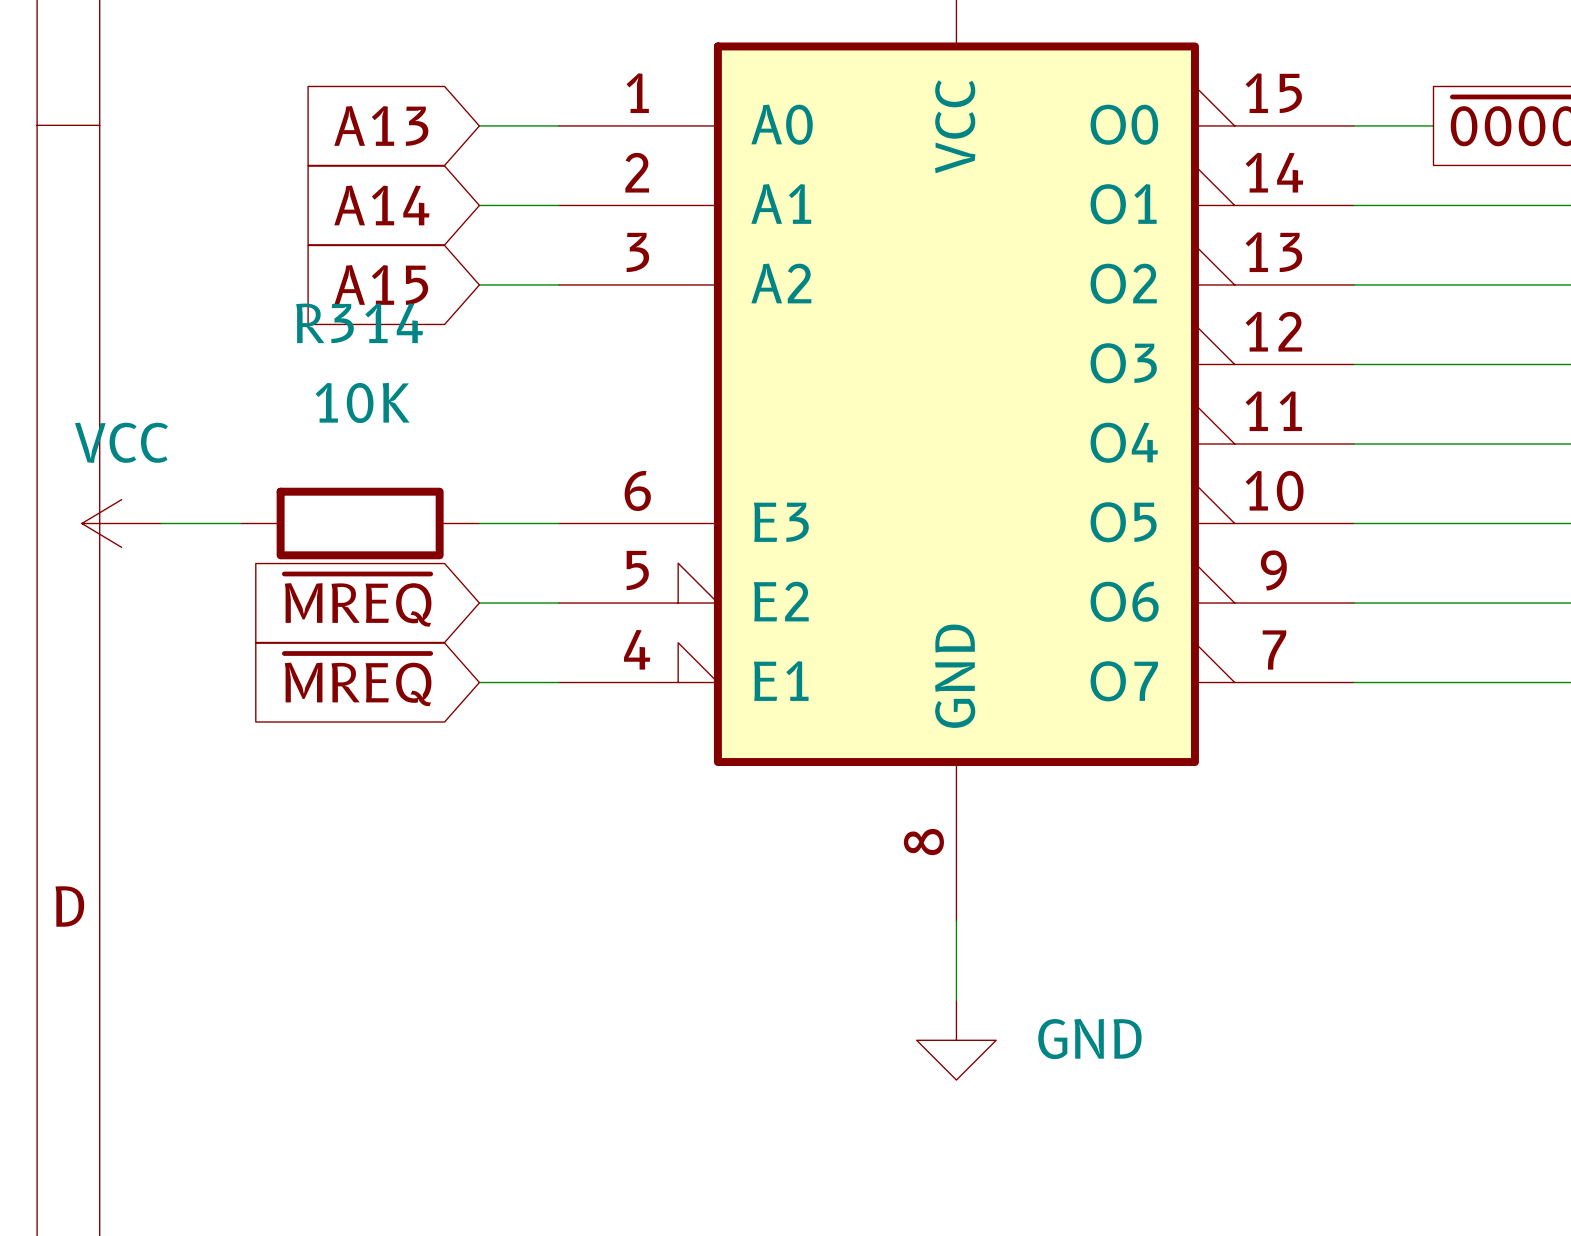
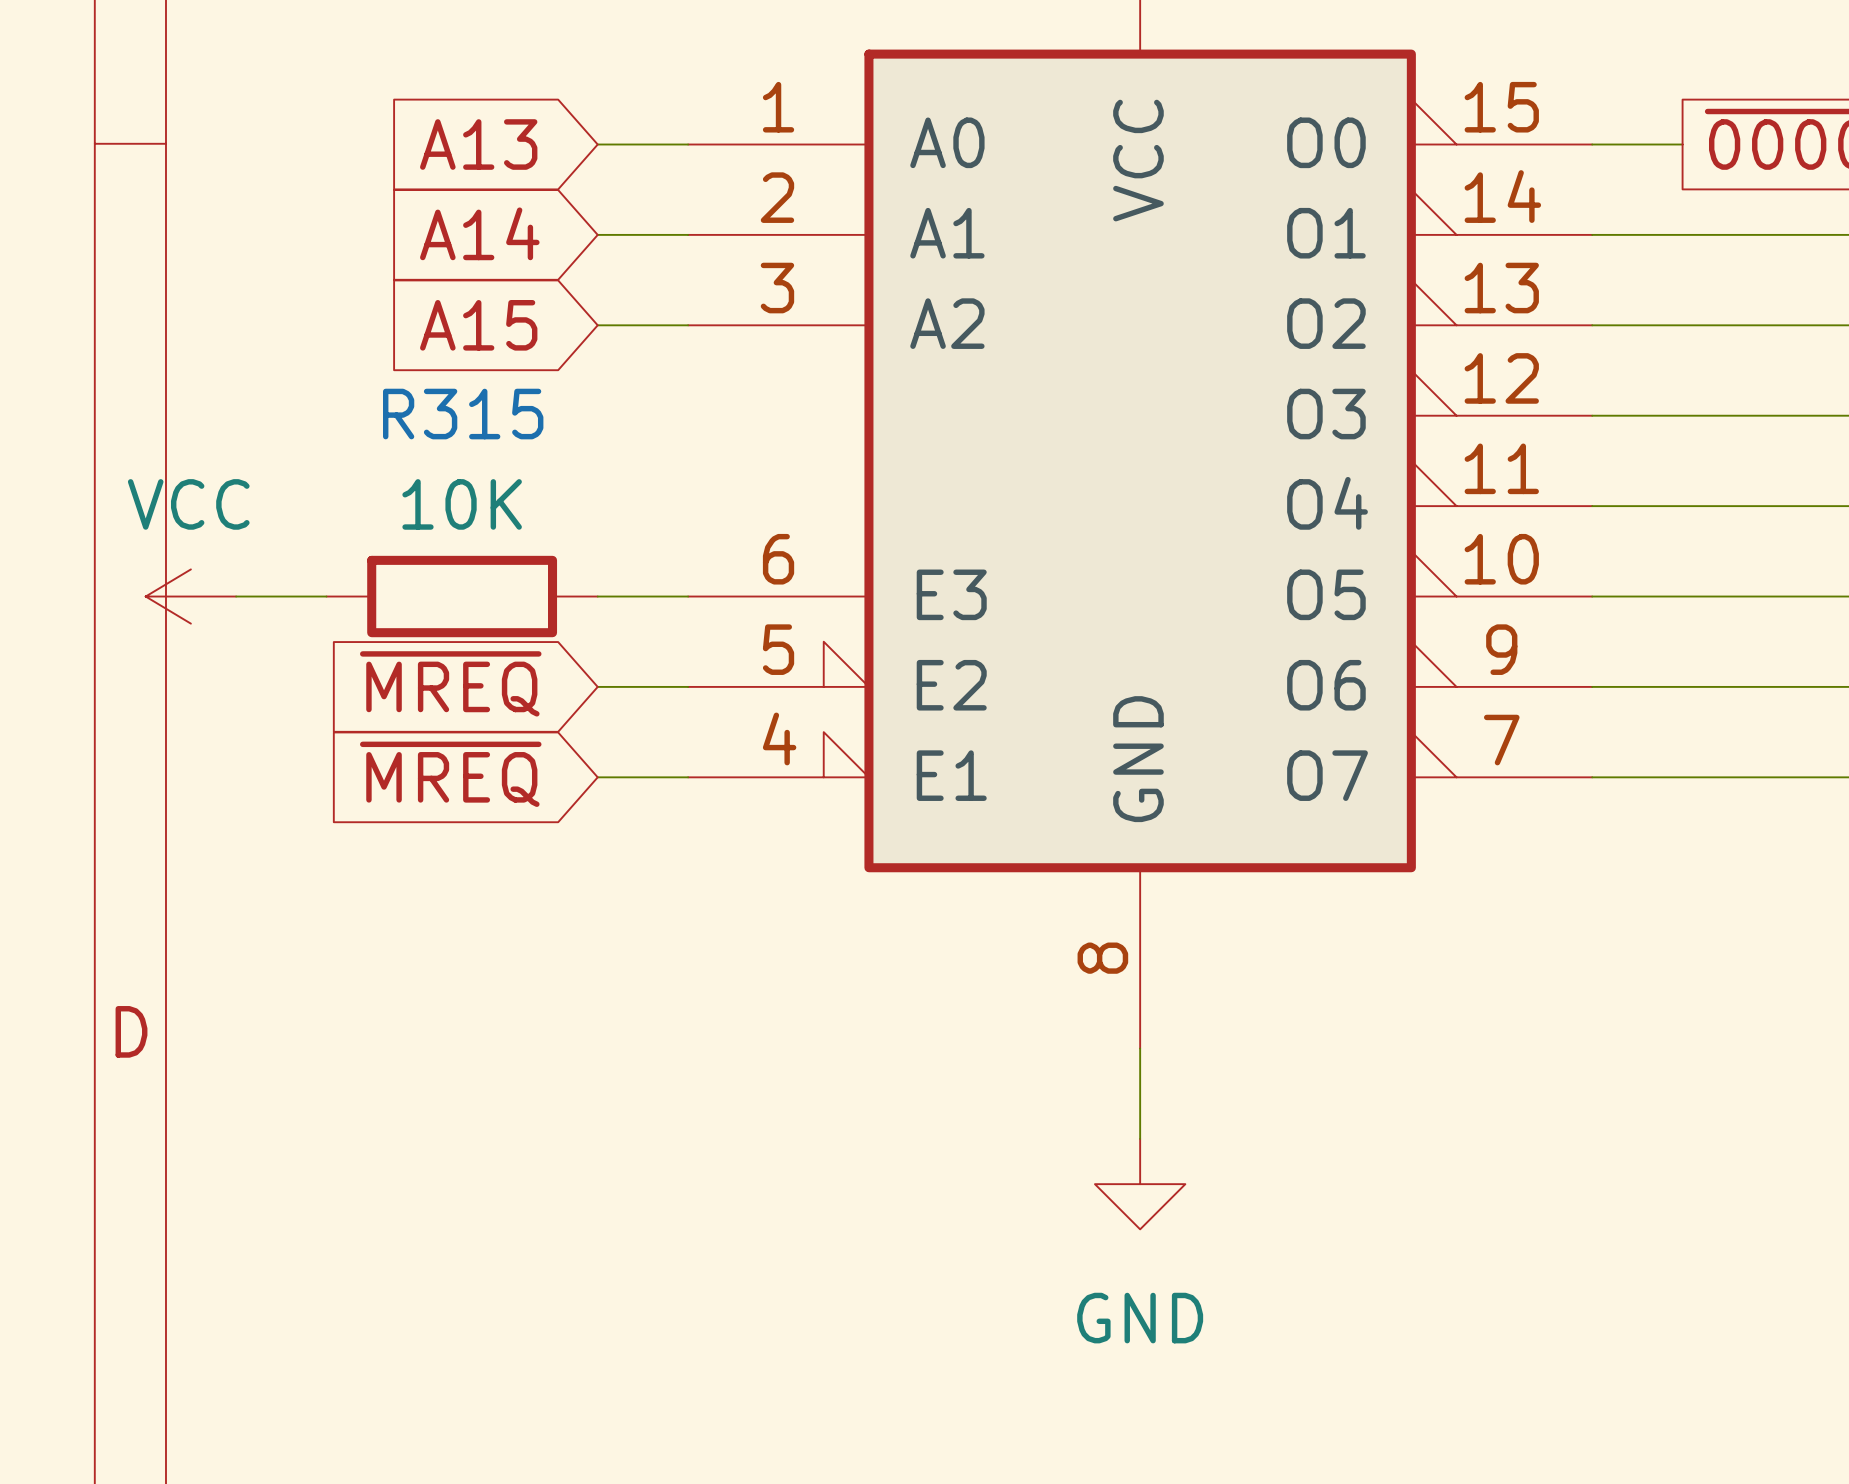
R314 name: R314 (359, 323) -> R315 (463, 414)
R314 value position: 10K (362, 402) -> 10K (462, 504)
power symbol text position: GND (1089, 1039) -> GND (1140, 1318)

